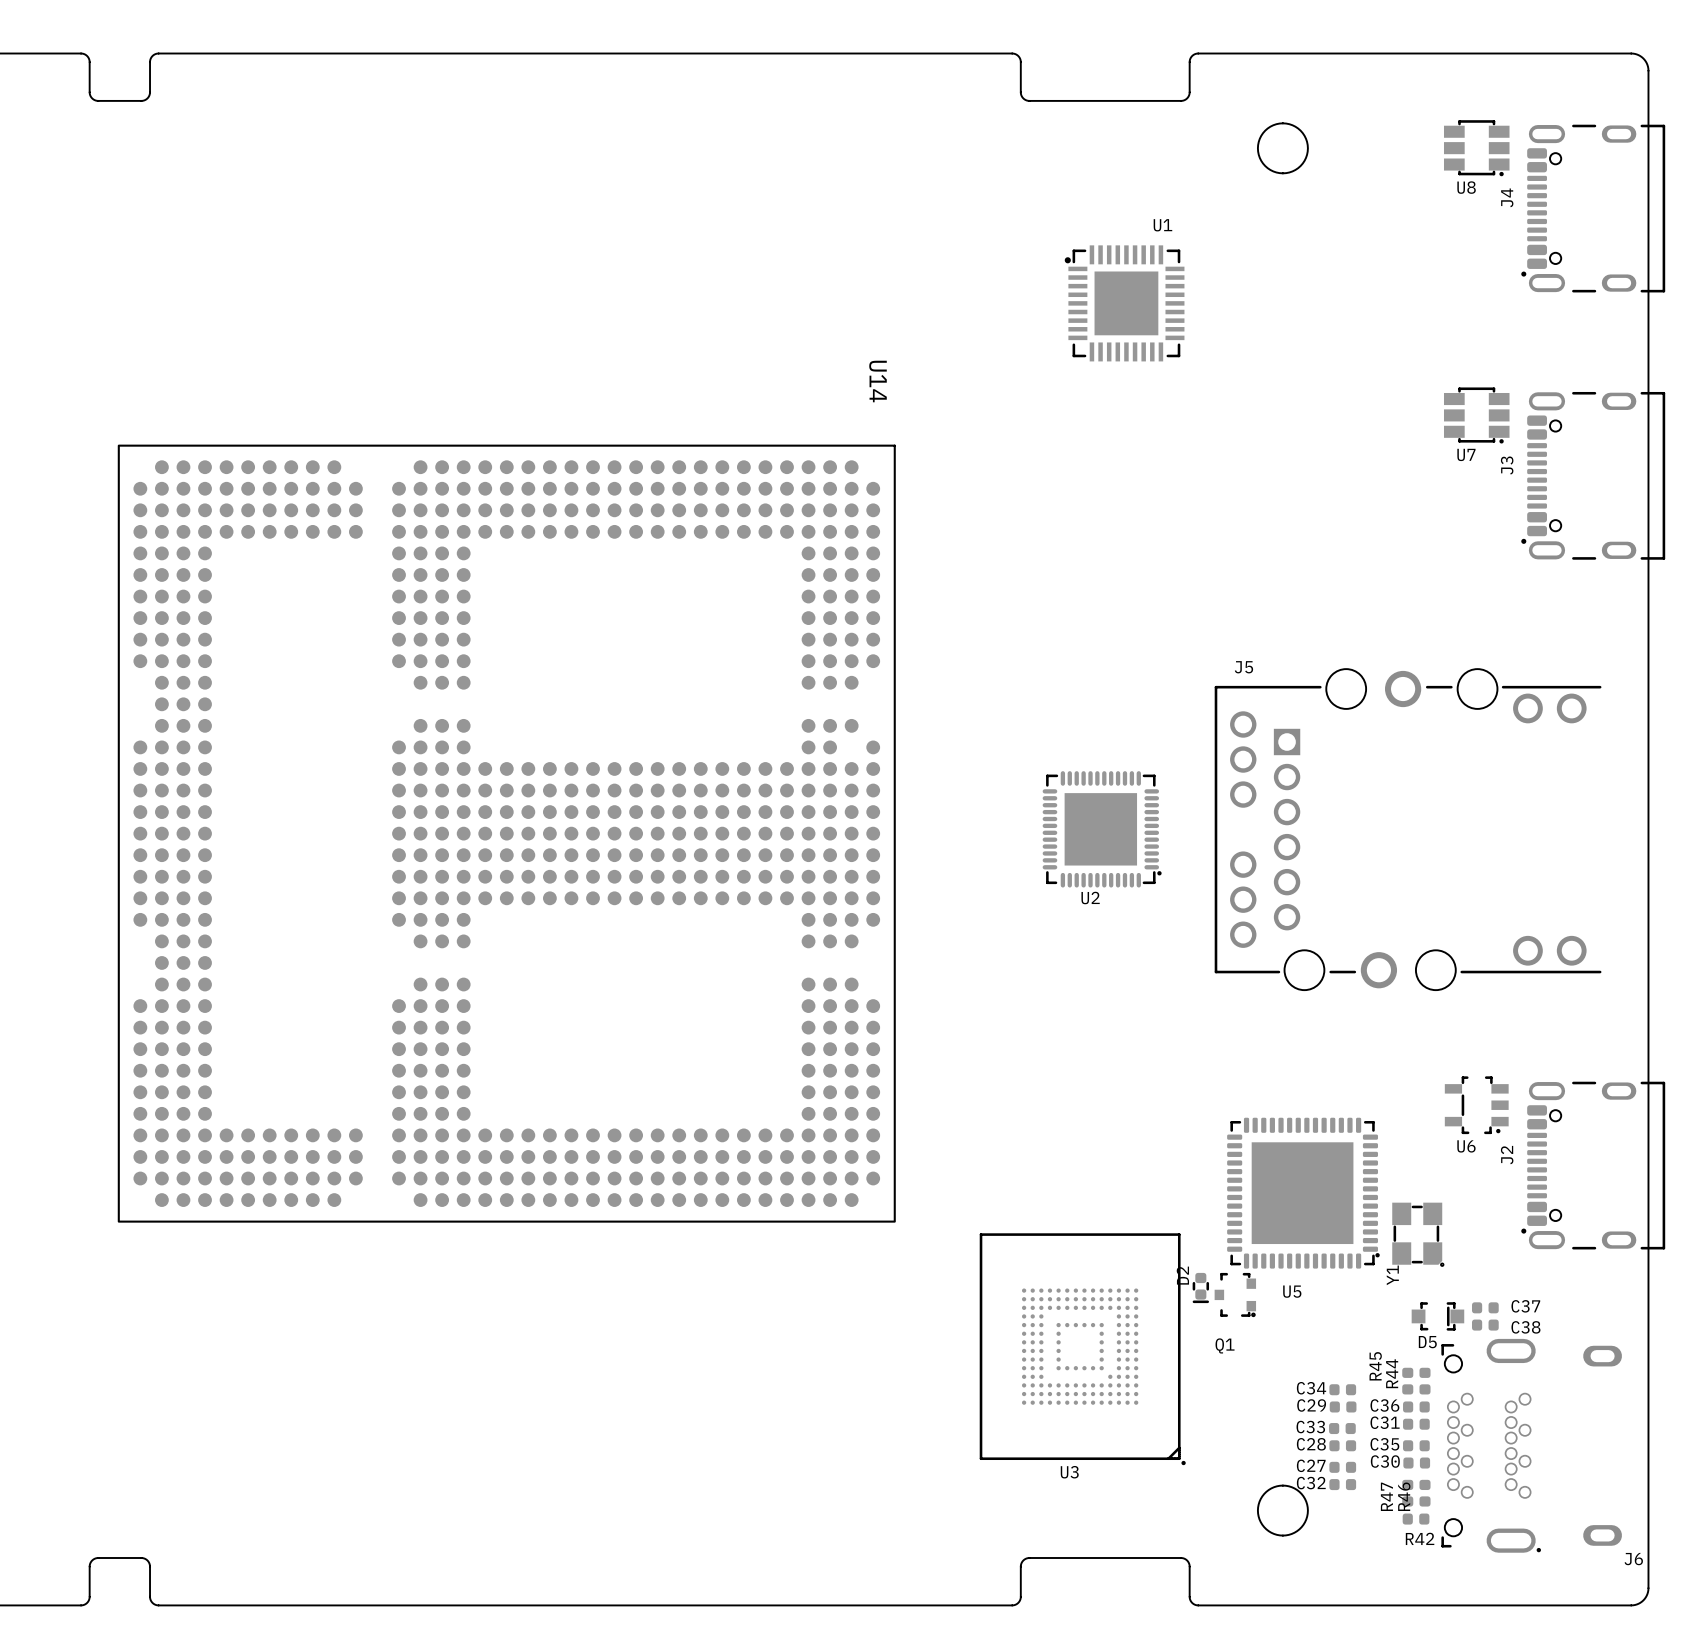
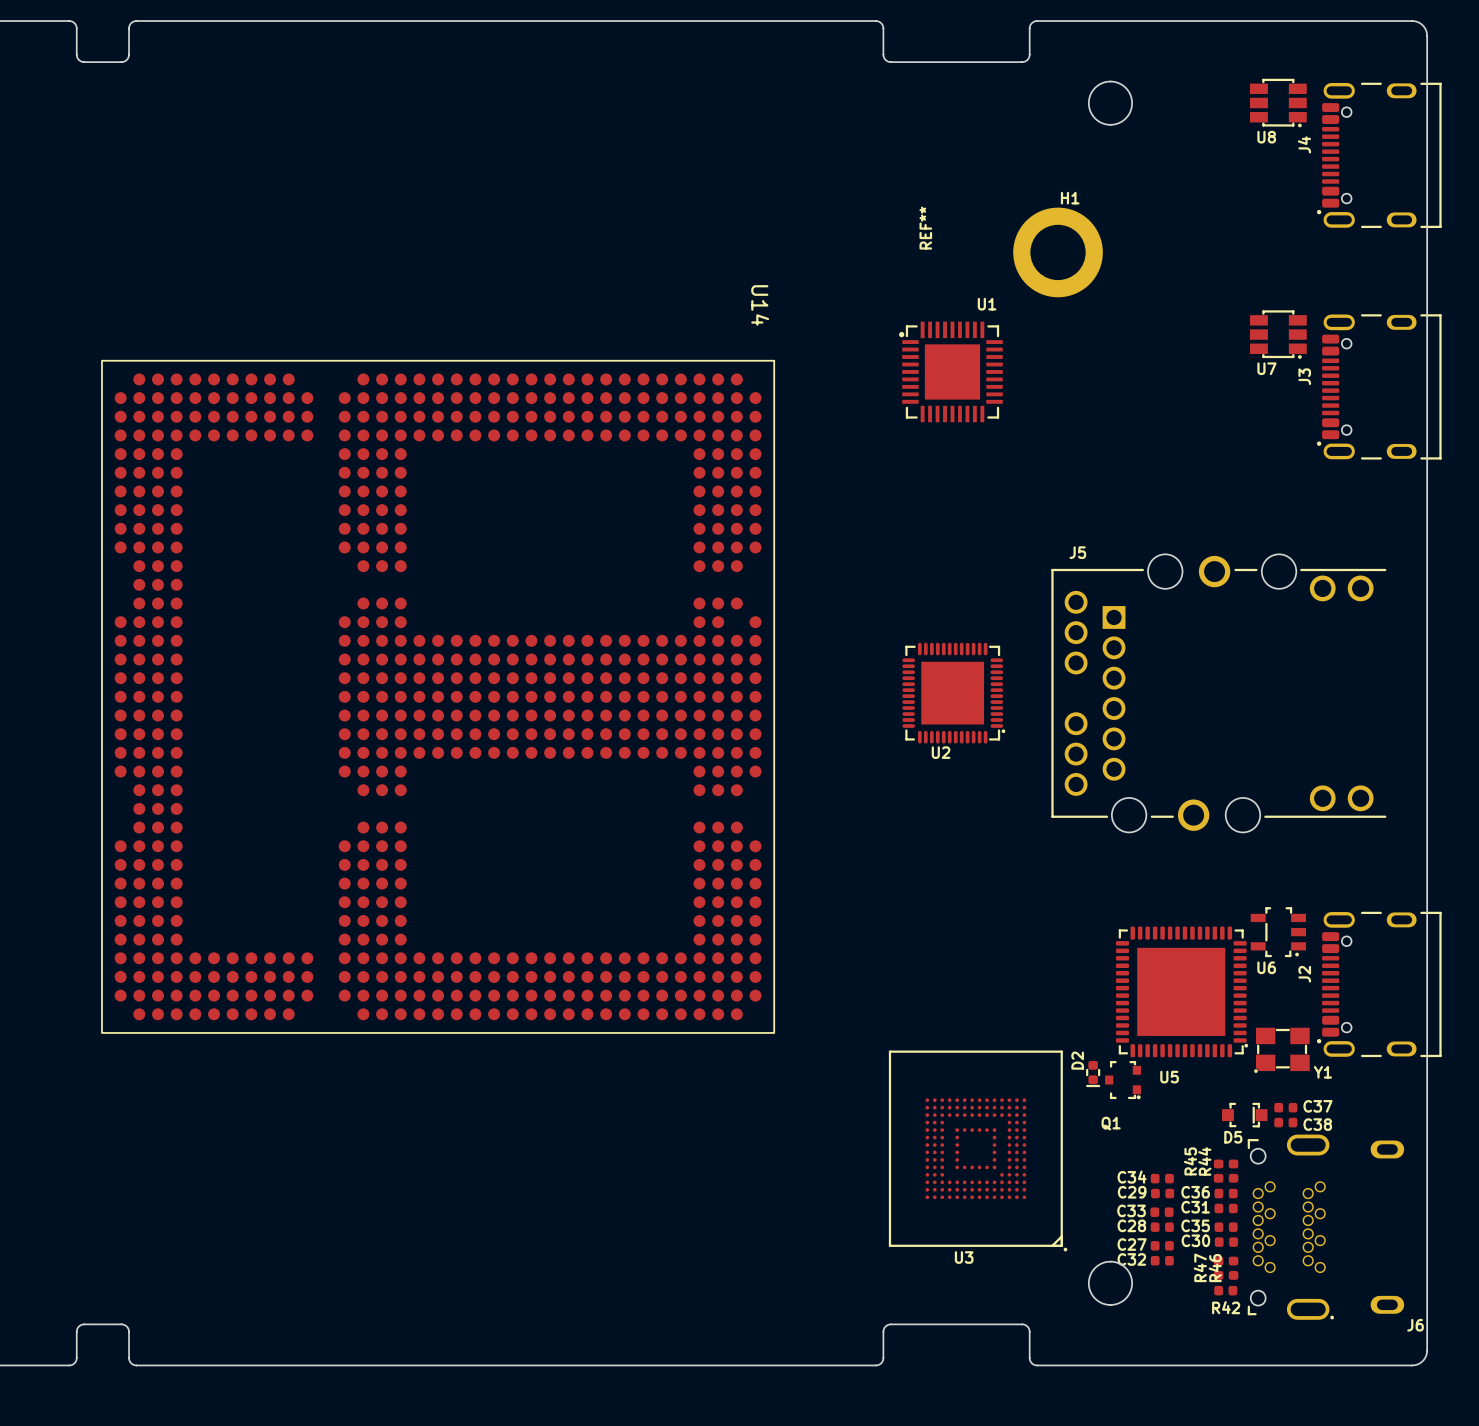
REF**: none -> (925, 228)
U1 position: (1124, 303) -> (950, 371)
H1: none -> (1058, 252)
U5 position: (1303, 1193) -> (1182, 991)
Y1 rotation: 0° (1418, 1234) -> 90° clockwise (1281, 1050)
Y1 position: (1418, 1234) -> (1281, 1050)
Y1 name position: Y1 (1392, 1275) -> Y1 (1322, 1072)
D2 position: (1200, 1288) -> (1093, 1074)
Q1 position: (1235, 1295) -> (1123, 1080)
U3 position: (1082, 1349) -> (978, 1150)

